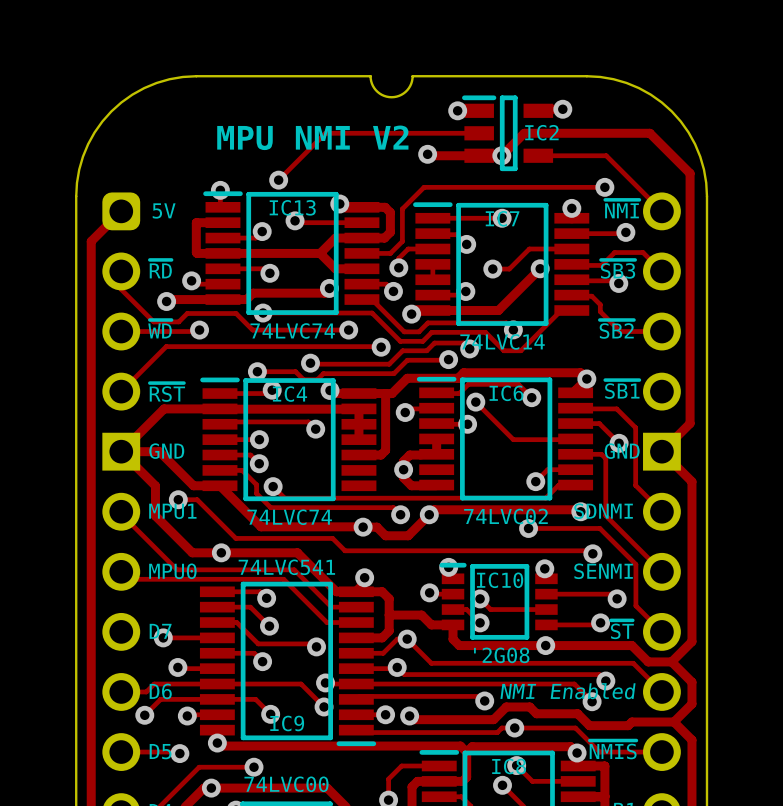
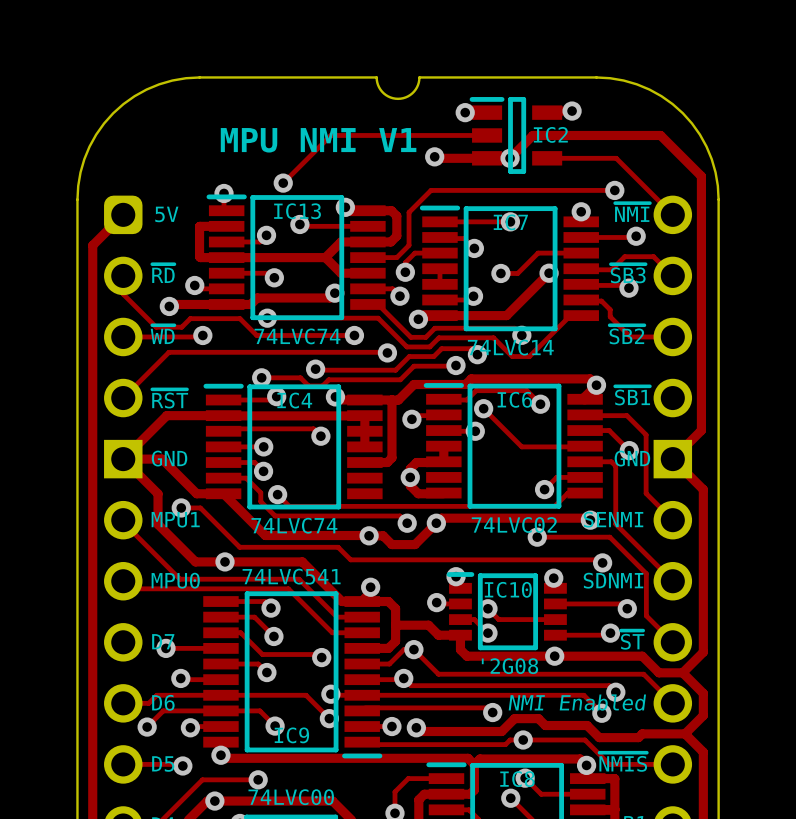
text: MPU NMI V2 (312, 137) -> MPU NMI V1 (318, 140)
text: SDNMI (603, 511) -> SENMI (613, 519)
text: SENMI (603, 571) -> SDNMI (613, 580)

